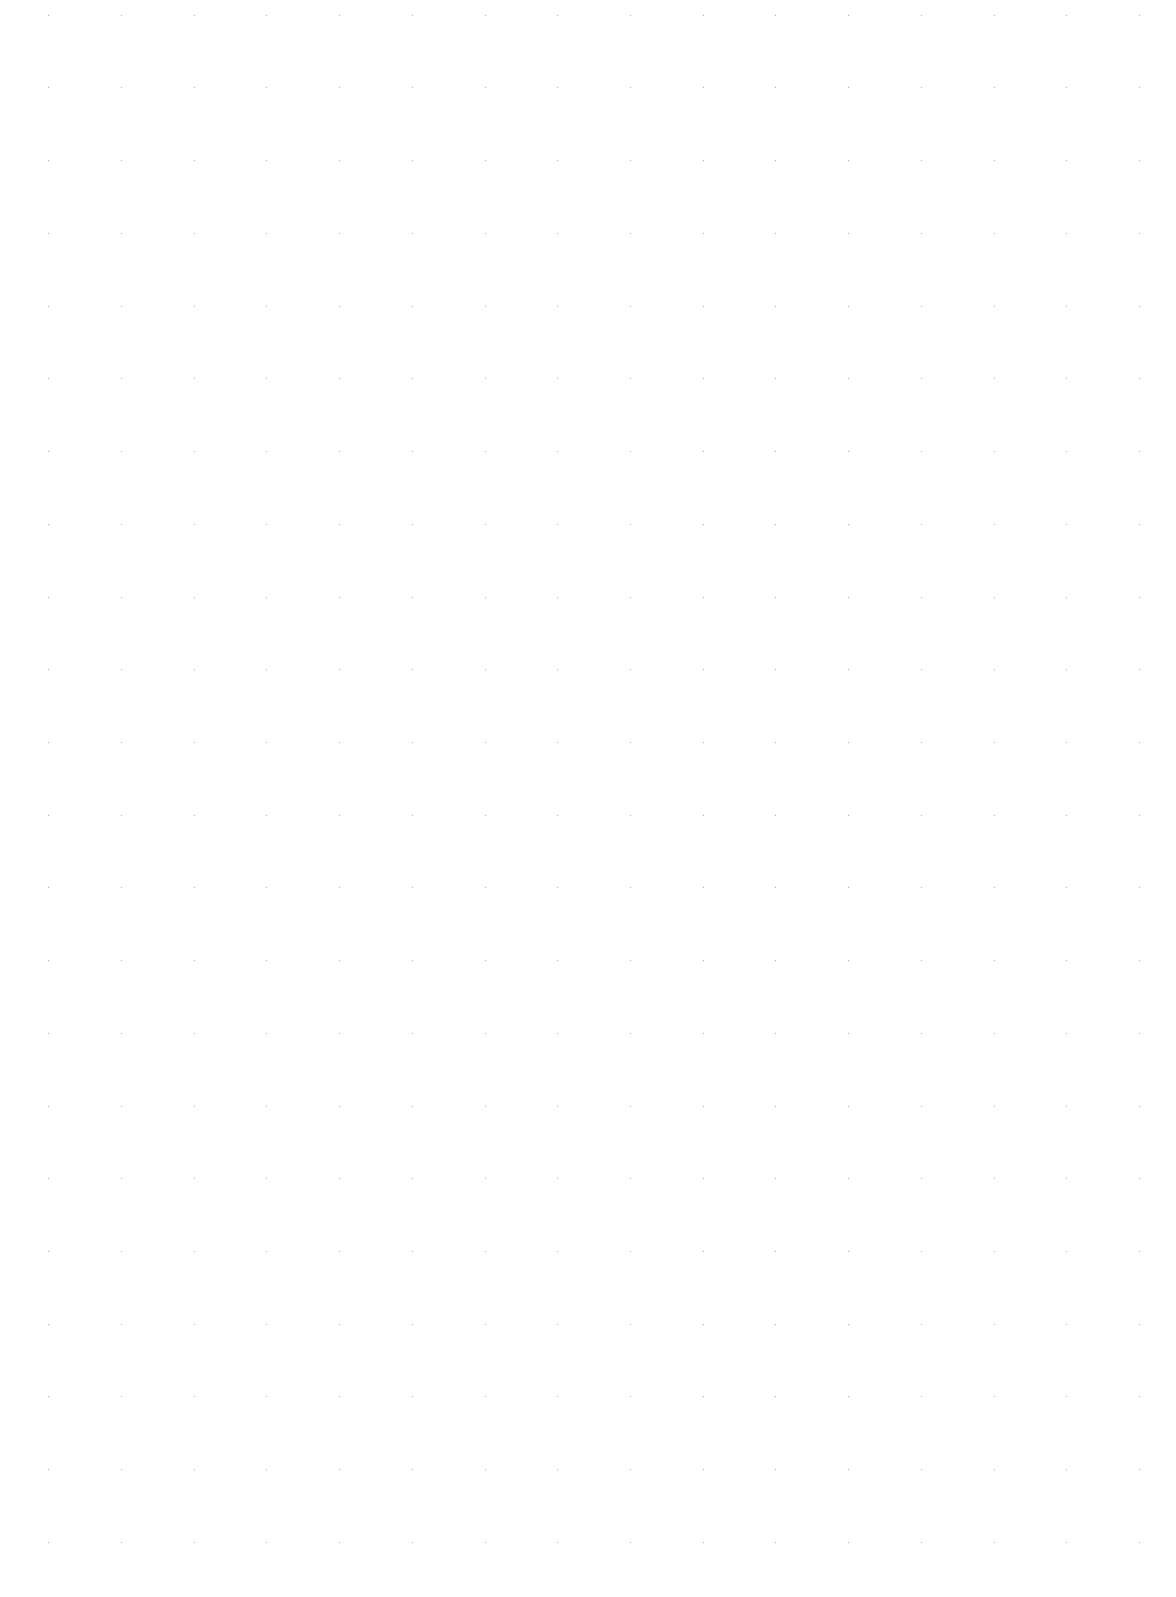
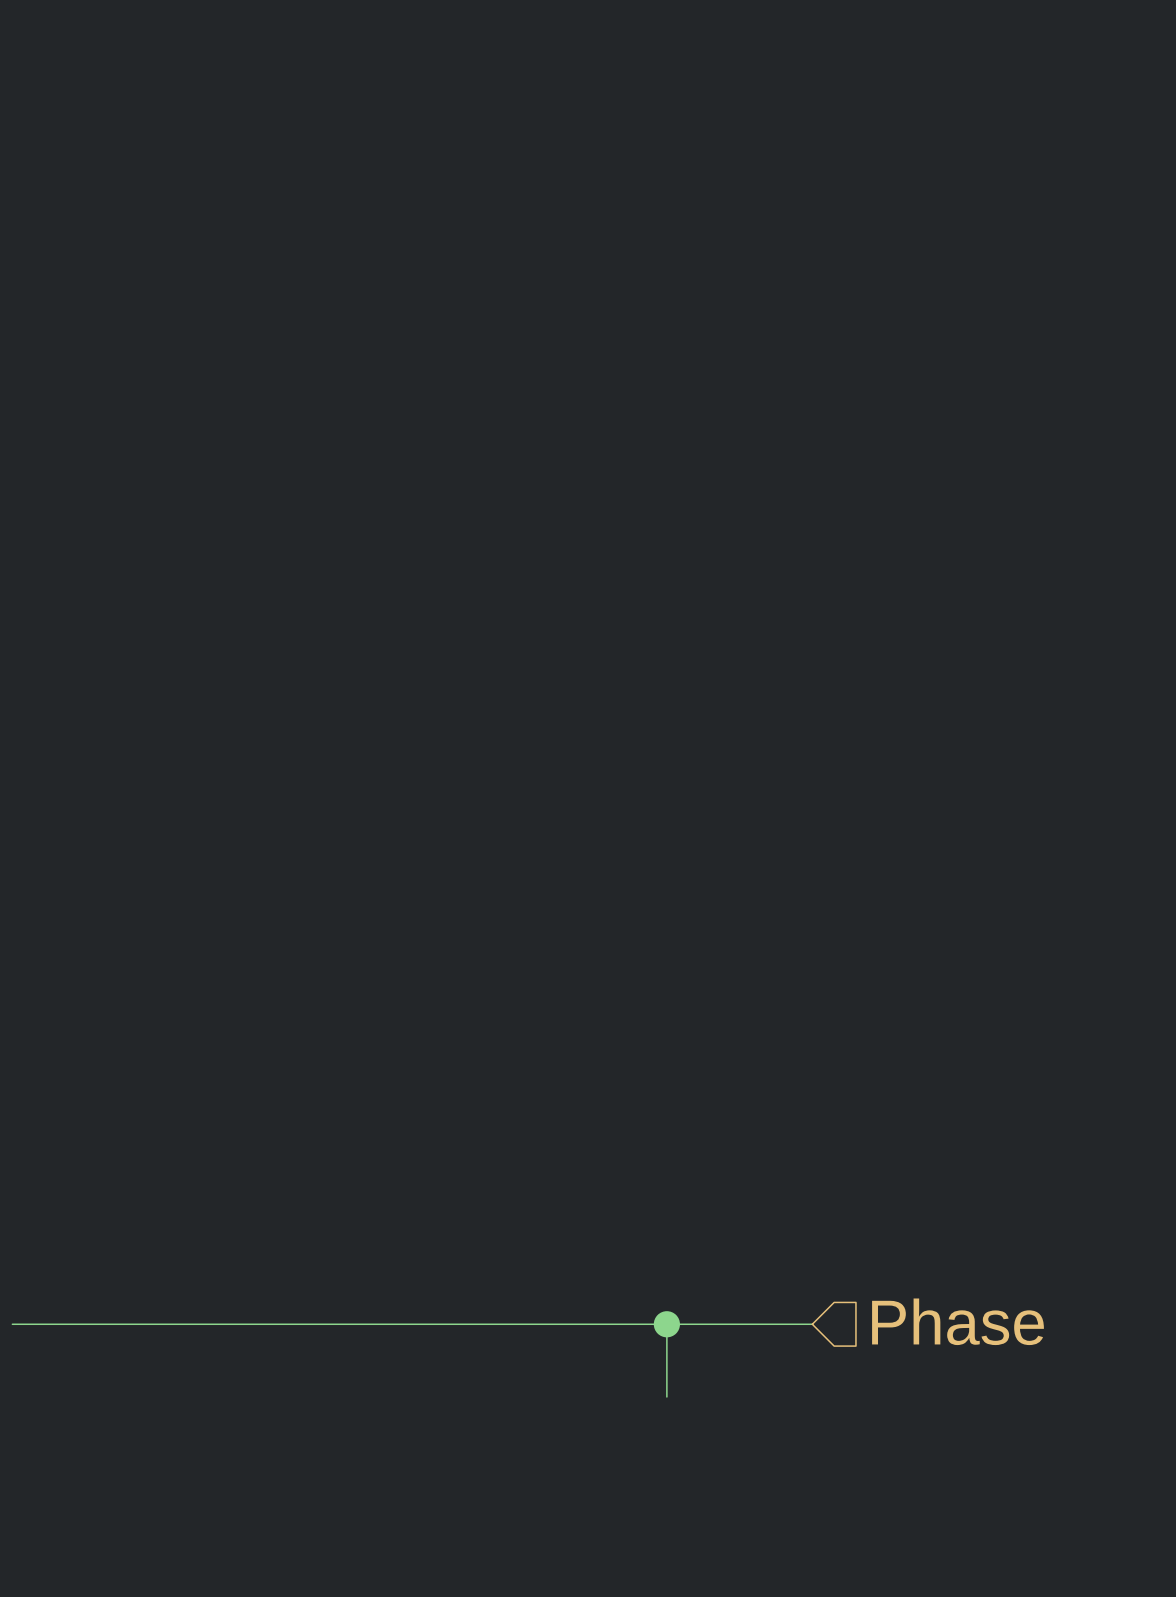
hierarchical label: none -> Phase (957, 1321)
wire: none -> (12, 1324) (812, 1324)
wire: none -> (666, 1324) (666, 1396)
junction: none -> (666, 1324)

